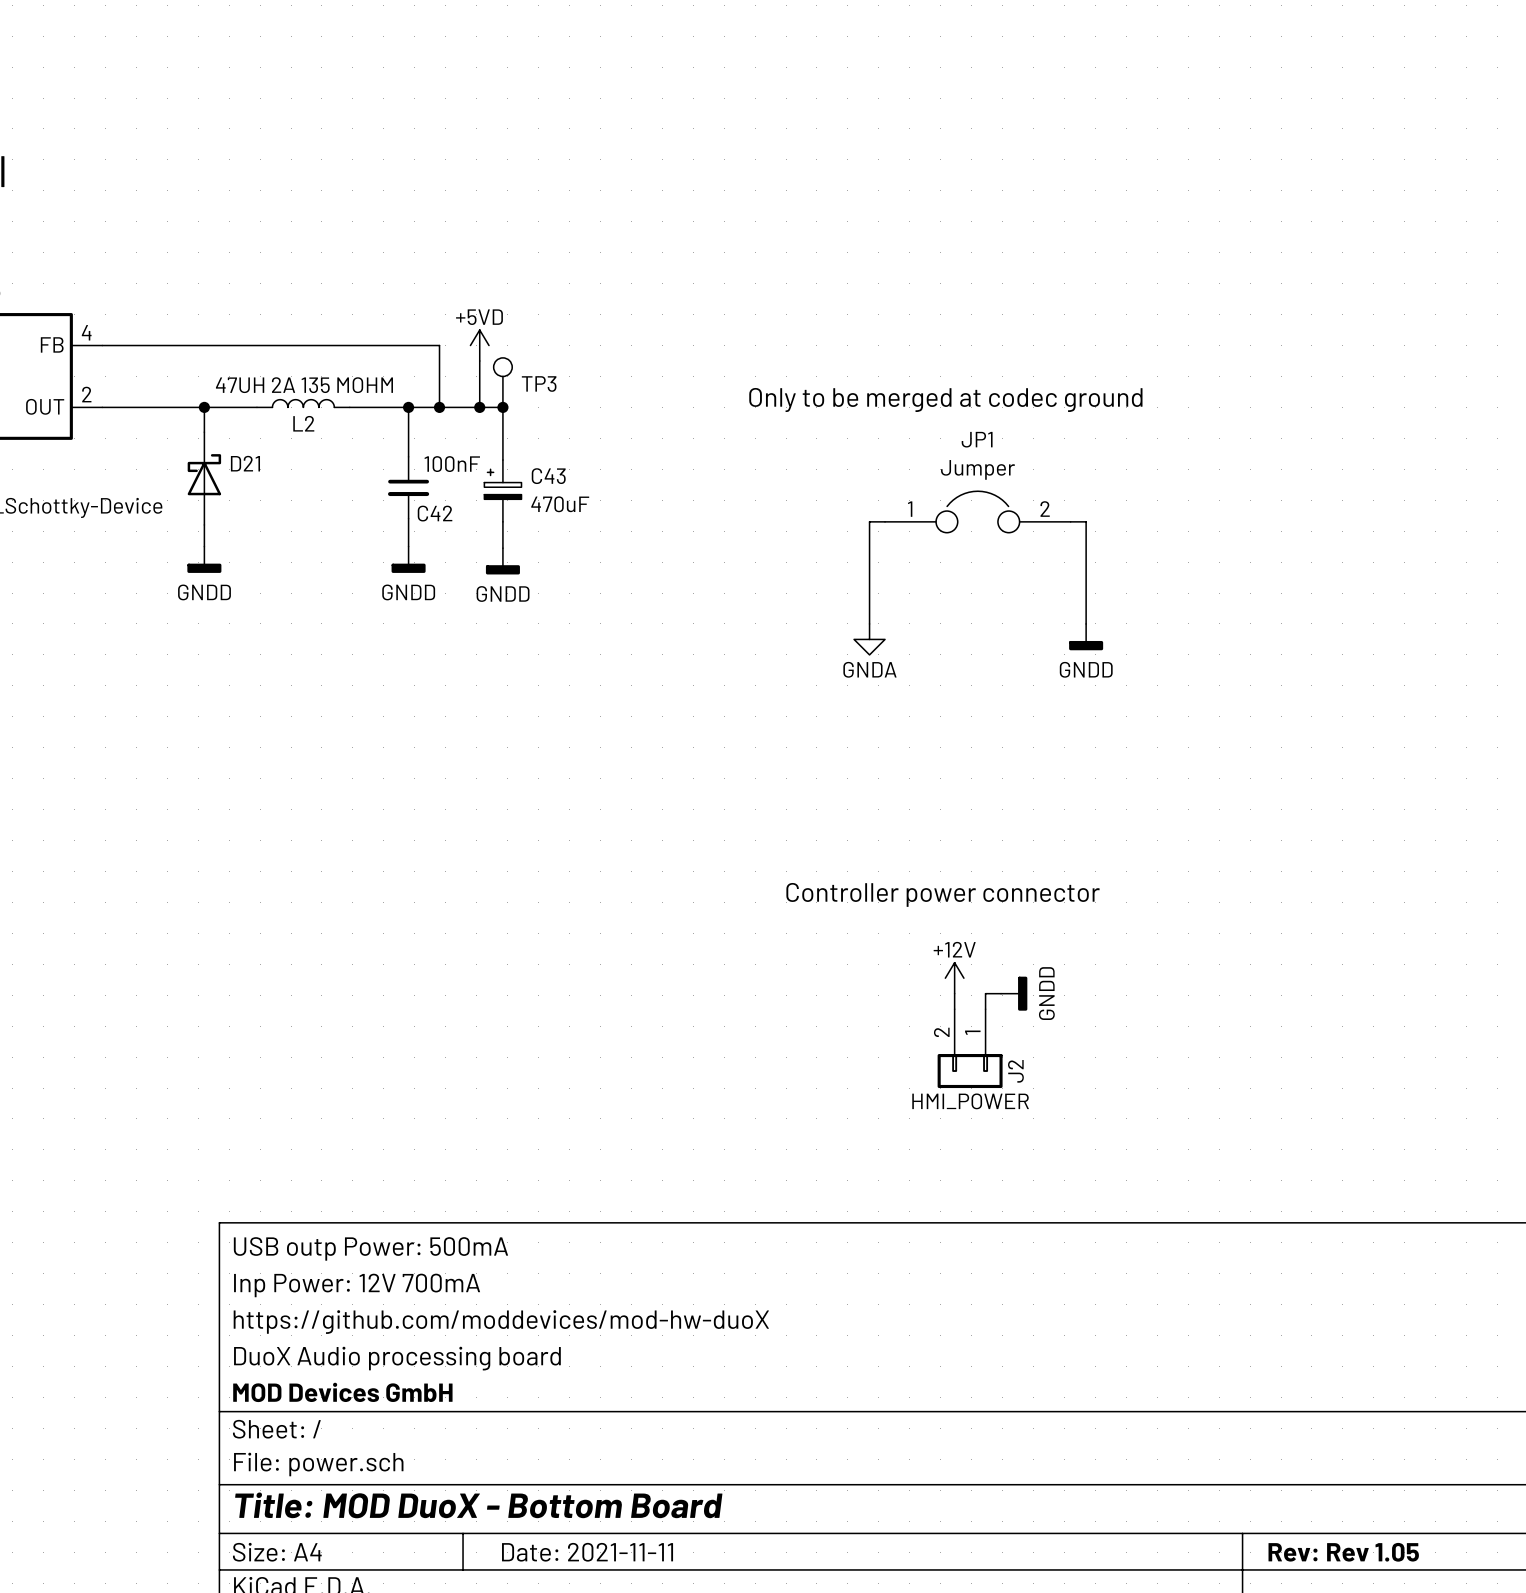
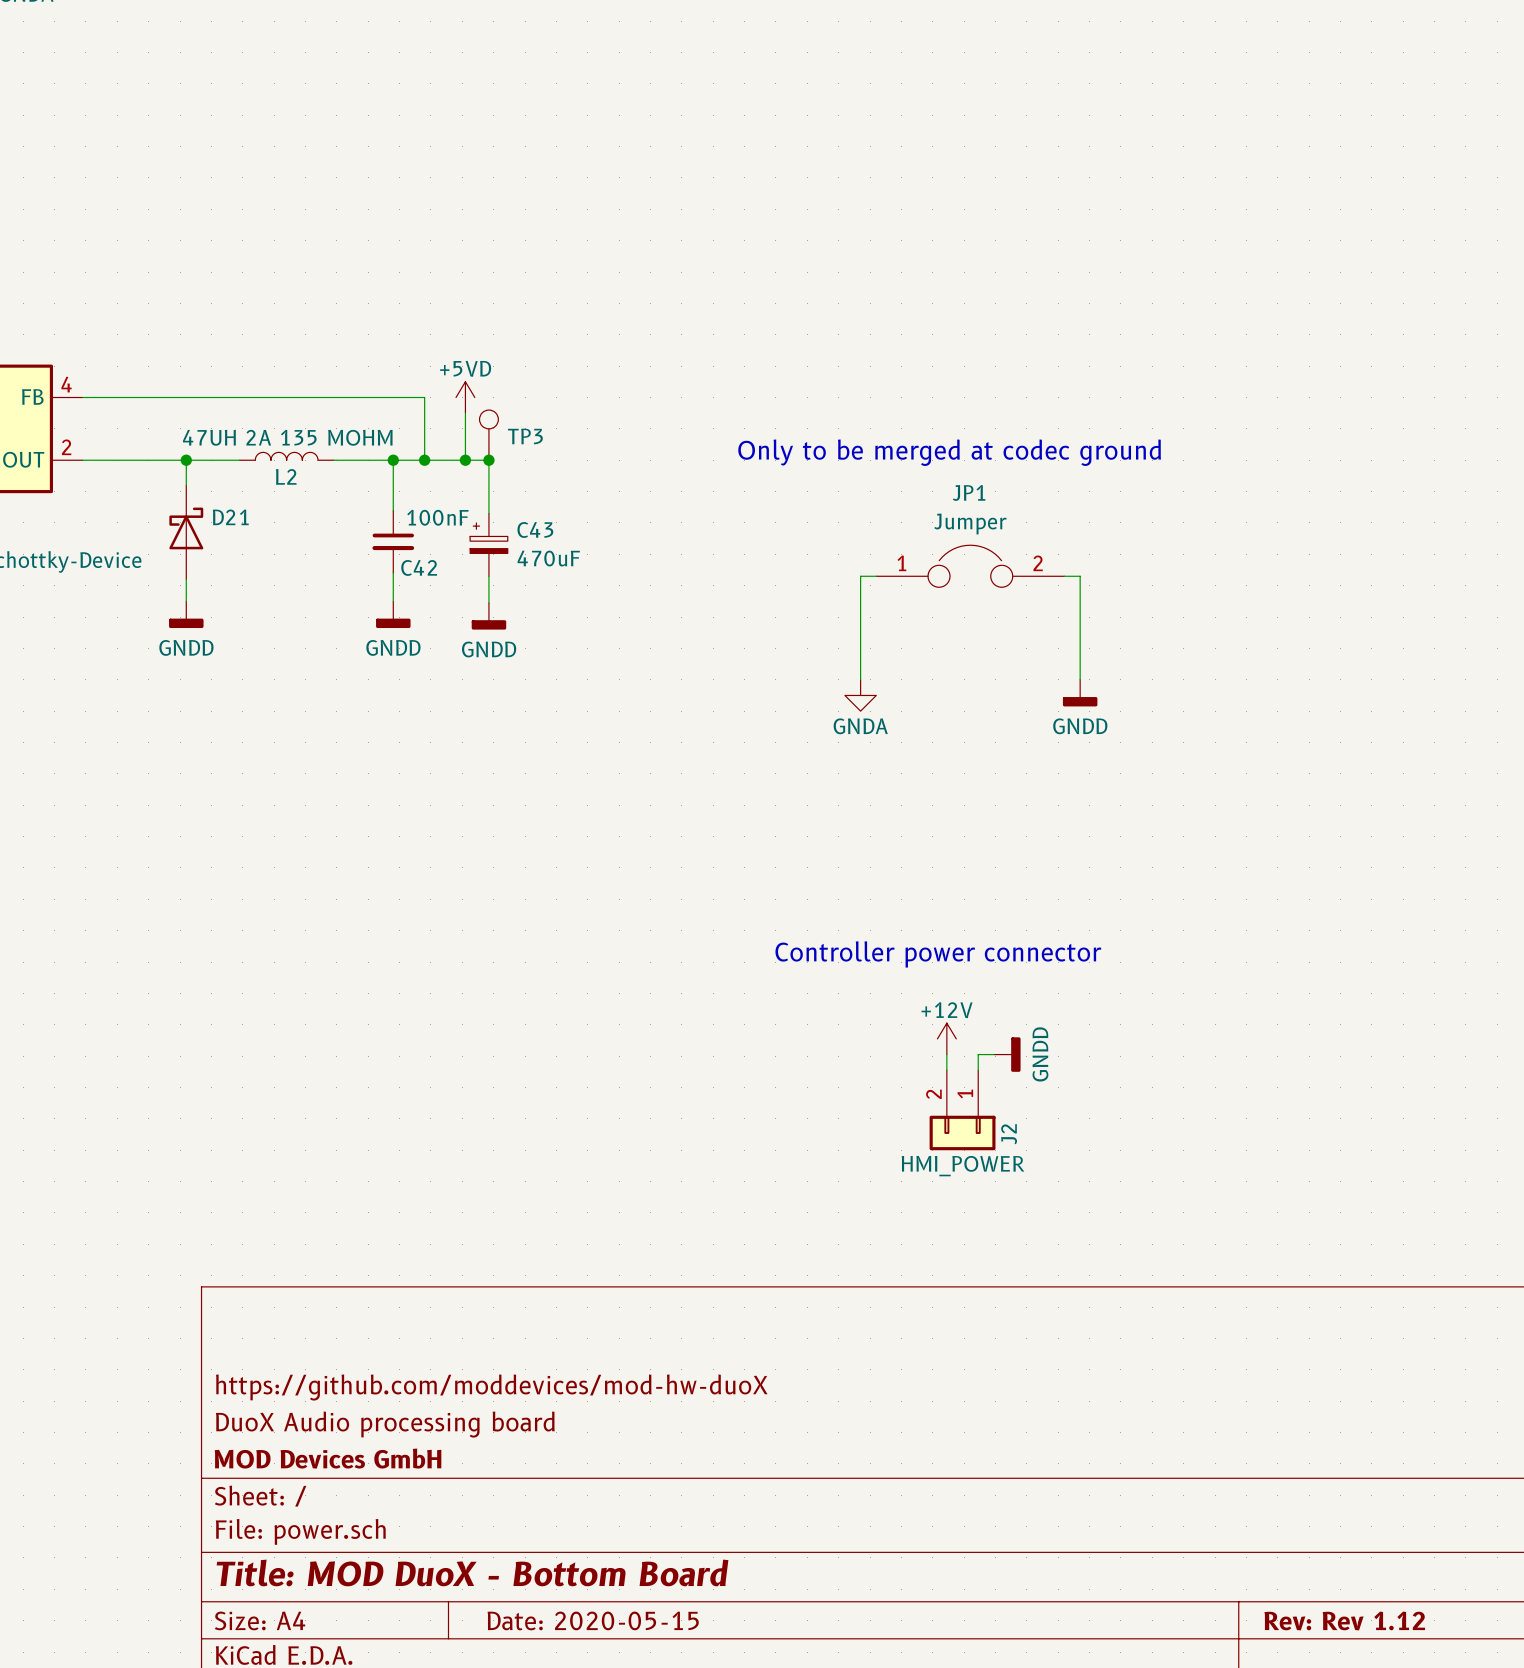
title block: USB outp Power: 500mA (370, 1248) -> none
title block: Inp Power: 12V 700mA (357, 1285) -> none
title block: Date: 2021-11-11 (587, 1552) -> Date: 2020-05-15 (593, 1620)
title block: Rev: Rev 1.05 (1343, 1552) -> Rev: Rev 1.12 (1344, 1620)

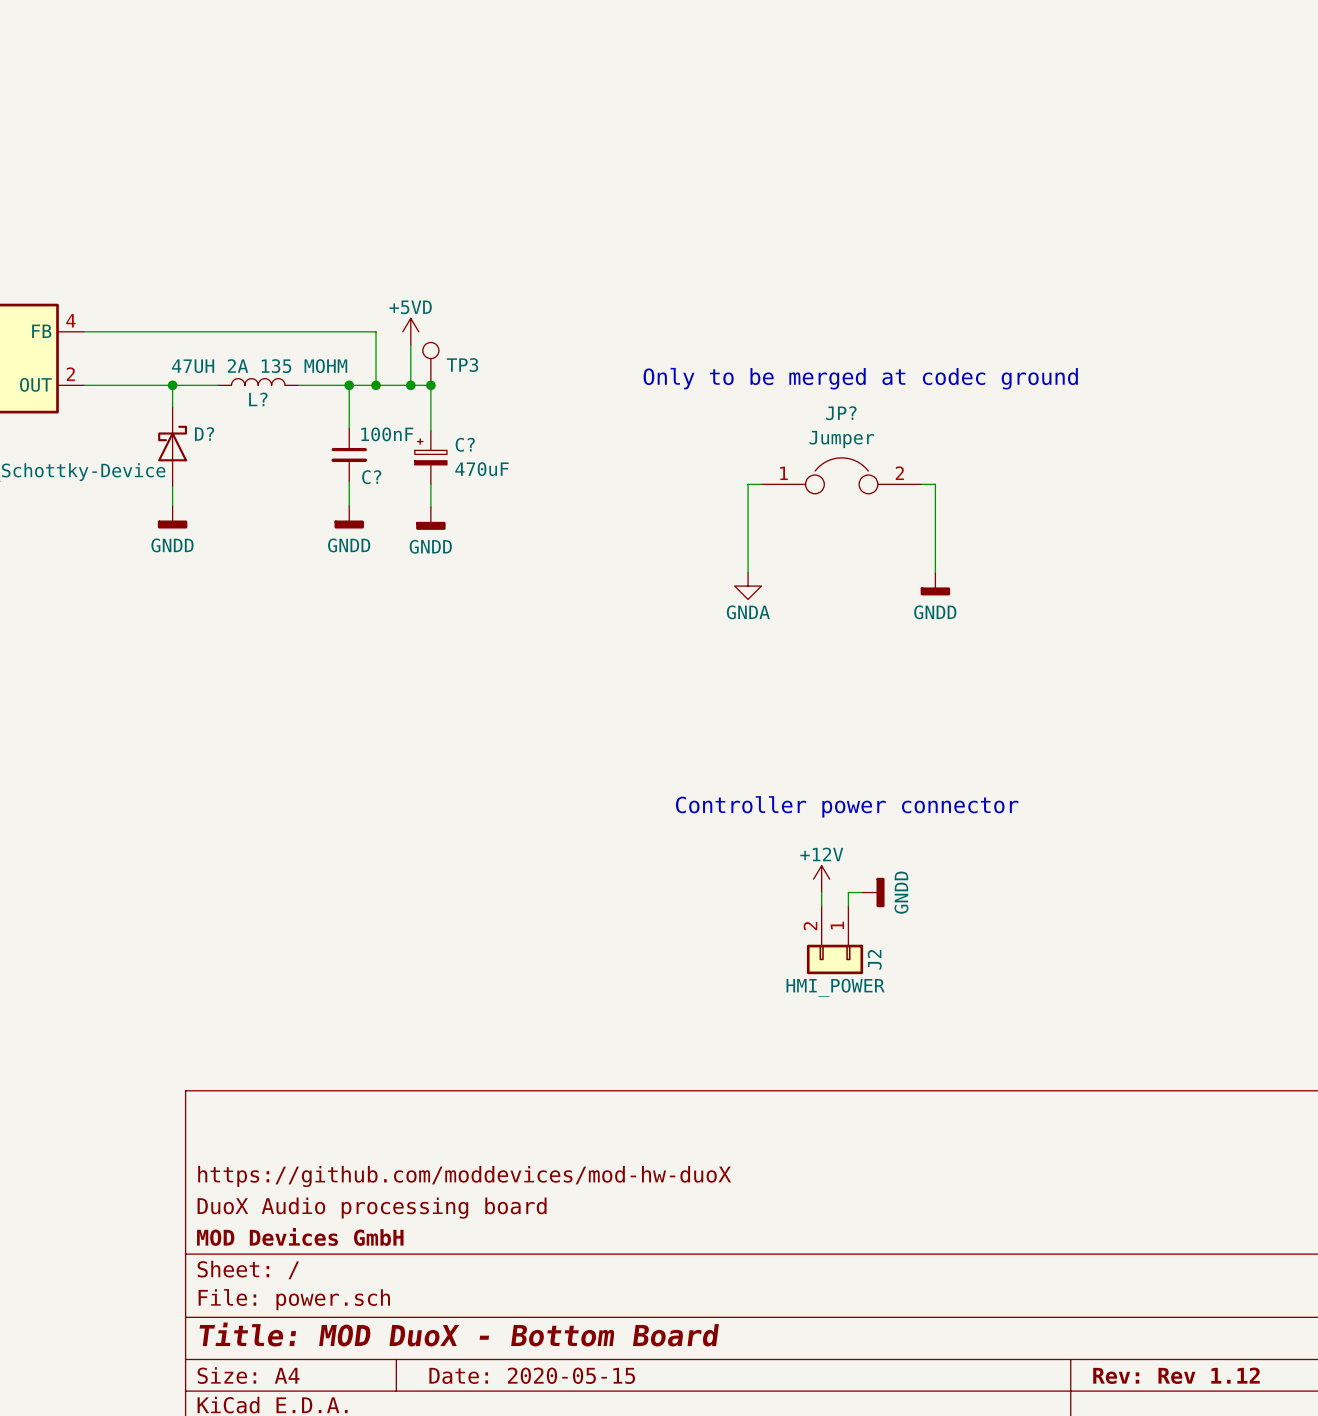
L2 name: L2 (286, 476) -> L? (258, 399)
JP1 name: JP1 (969, 492) -> JP? (841, 413)
D21 name: D21 (230, 517) -> D? (204, 433)
C43 name: C43 (535, 529) -> C? (465, 444)
C42 name: C42 (419, 567) -> C? (371, 477)

